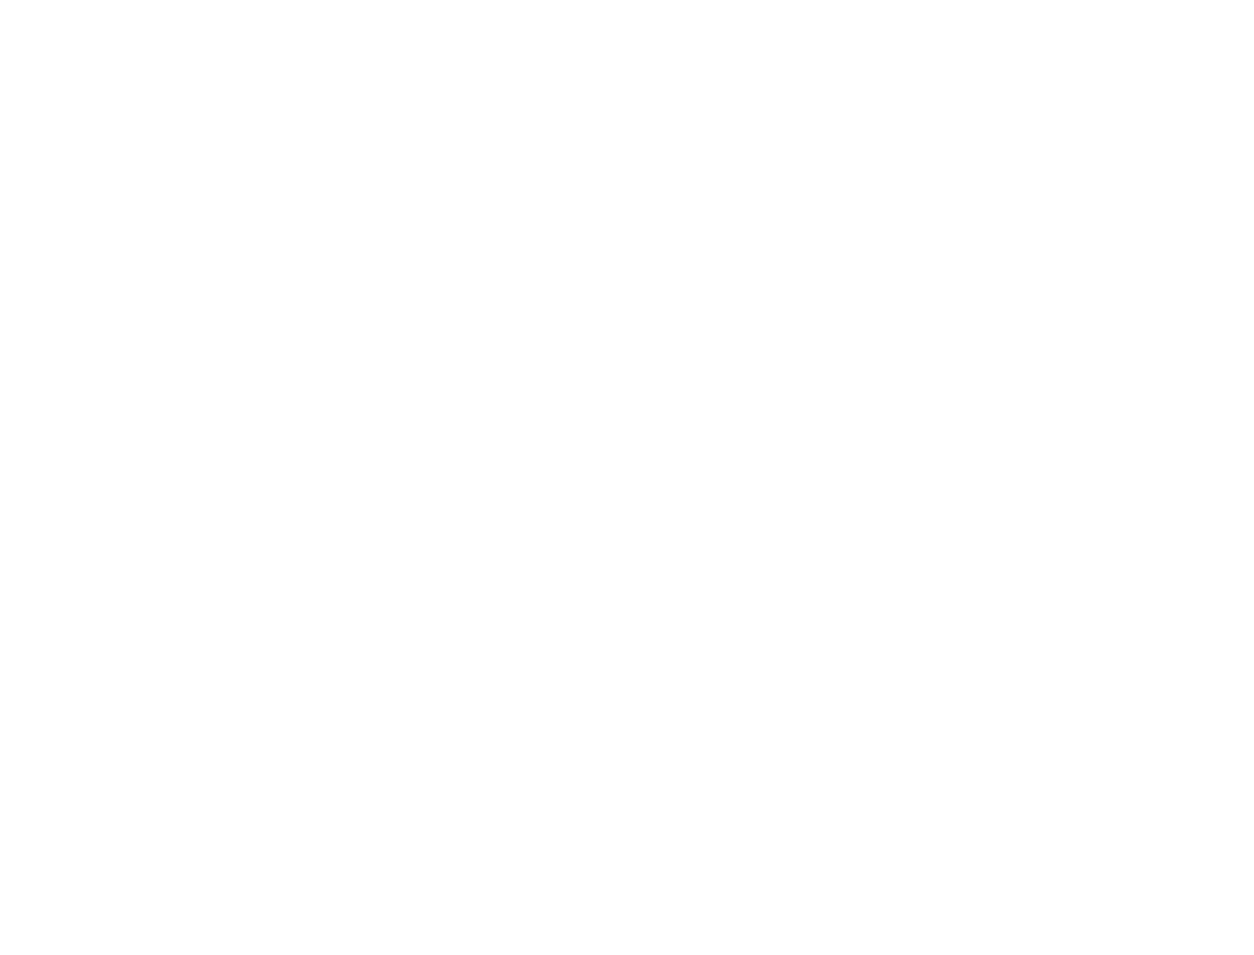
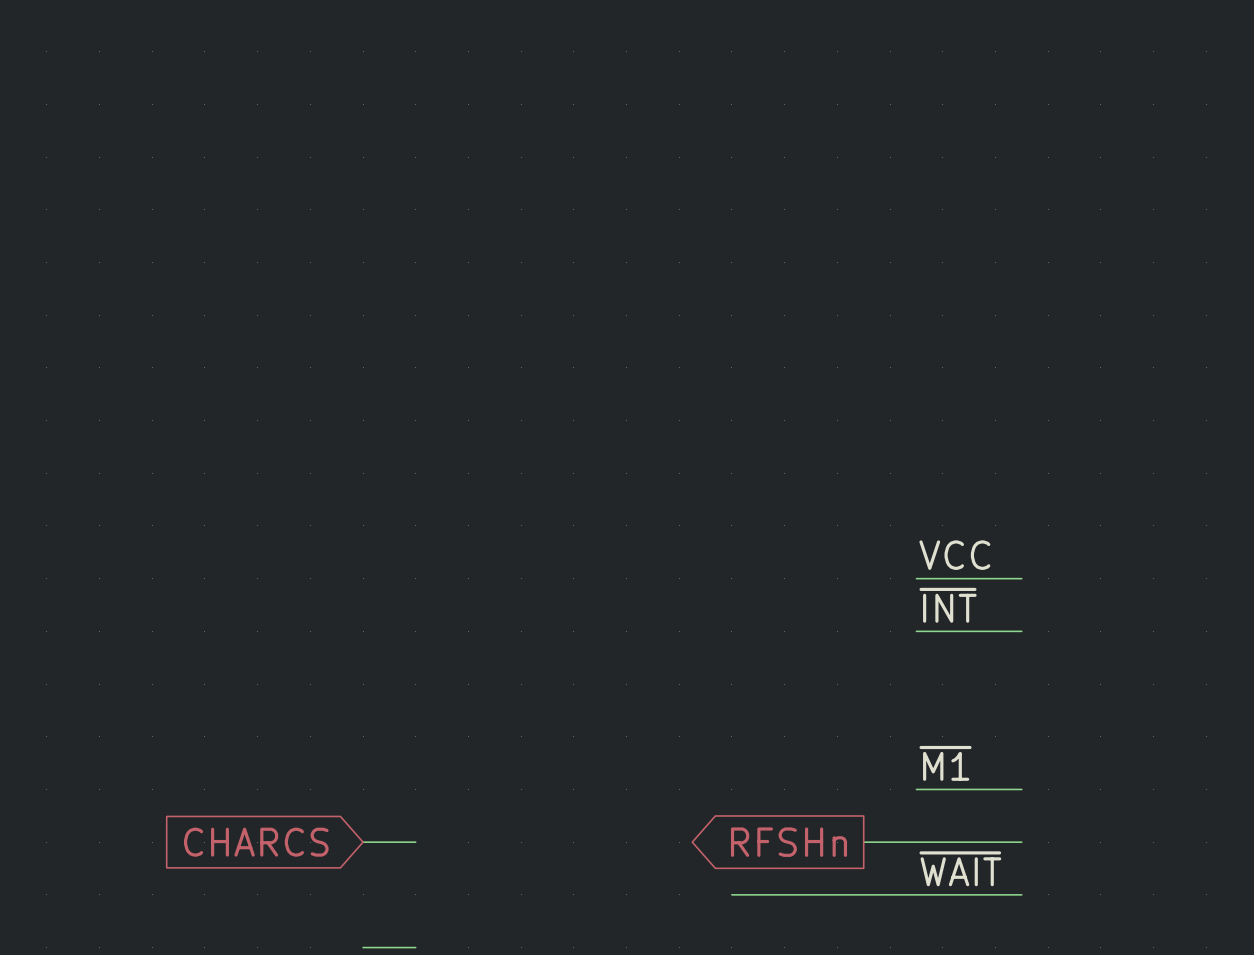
label: none -> VCC (954, 555)
wire: none -> (916, 578) (1021, 578)
label: none -> ~{INT} (948, 605)
wire: none -> (916, 631) (1021, 631)
label: none -> ~{M1} (945, 763)
wire: none -> (916, 789) (1021, 789)
global label: none -> CHARCS (256, 842)
wire: none -> (363, 842) (415, 842)
global label: none -> RFSHn (788, 842)
wire: none -> (863, 842) (1021, 842)
label: none -> ~{WAIT} (960, 868)
wire: none -> (731, 894) (1021, 894)
wire: none -> (363, 947) (415, 947)

